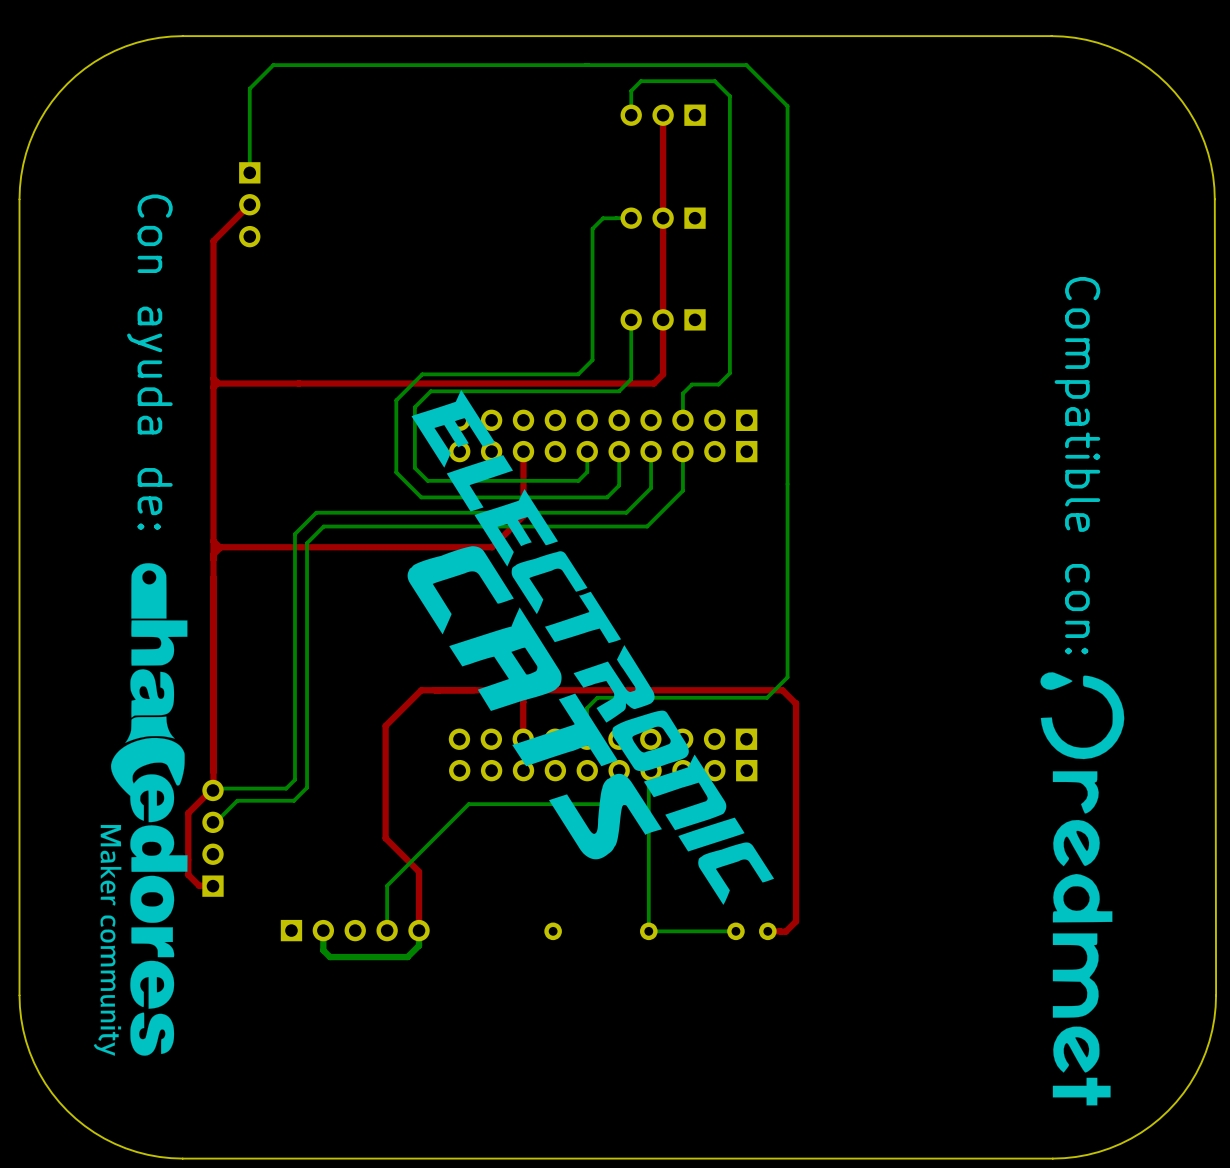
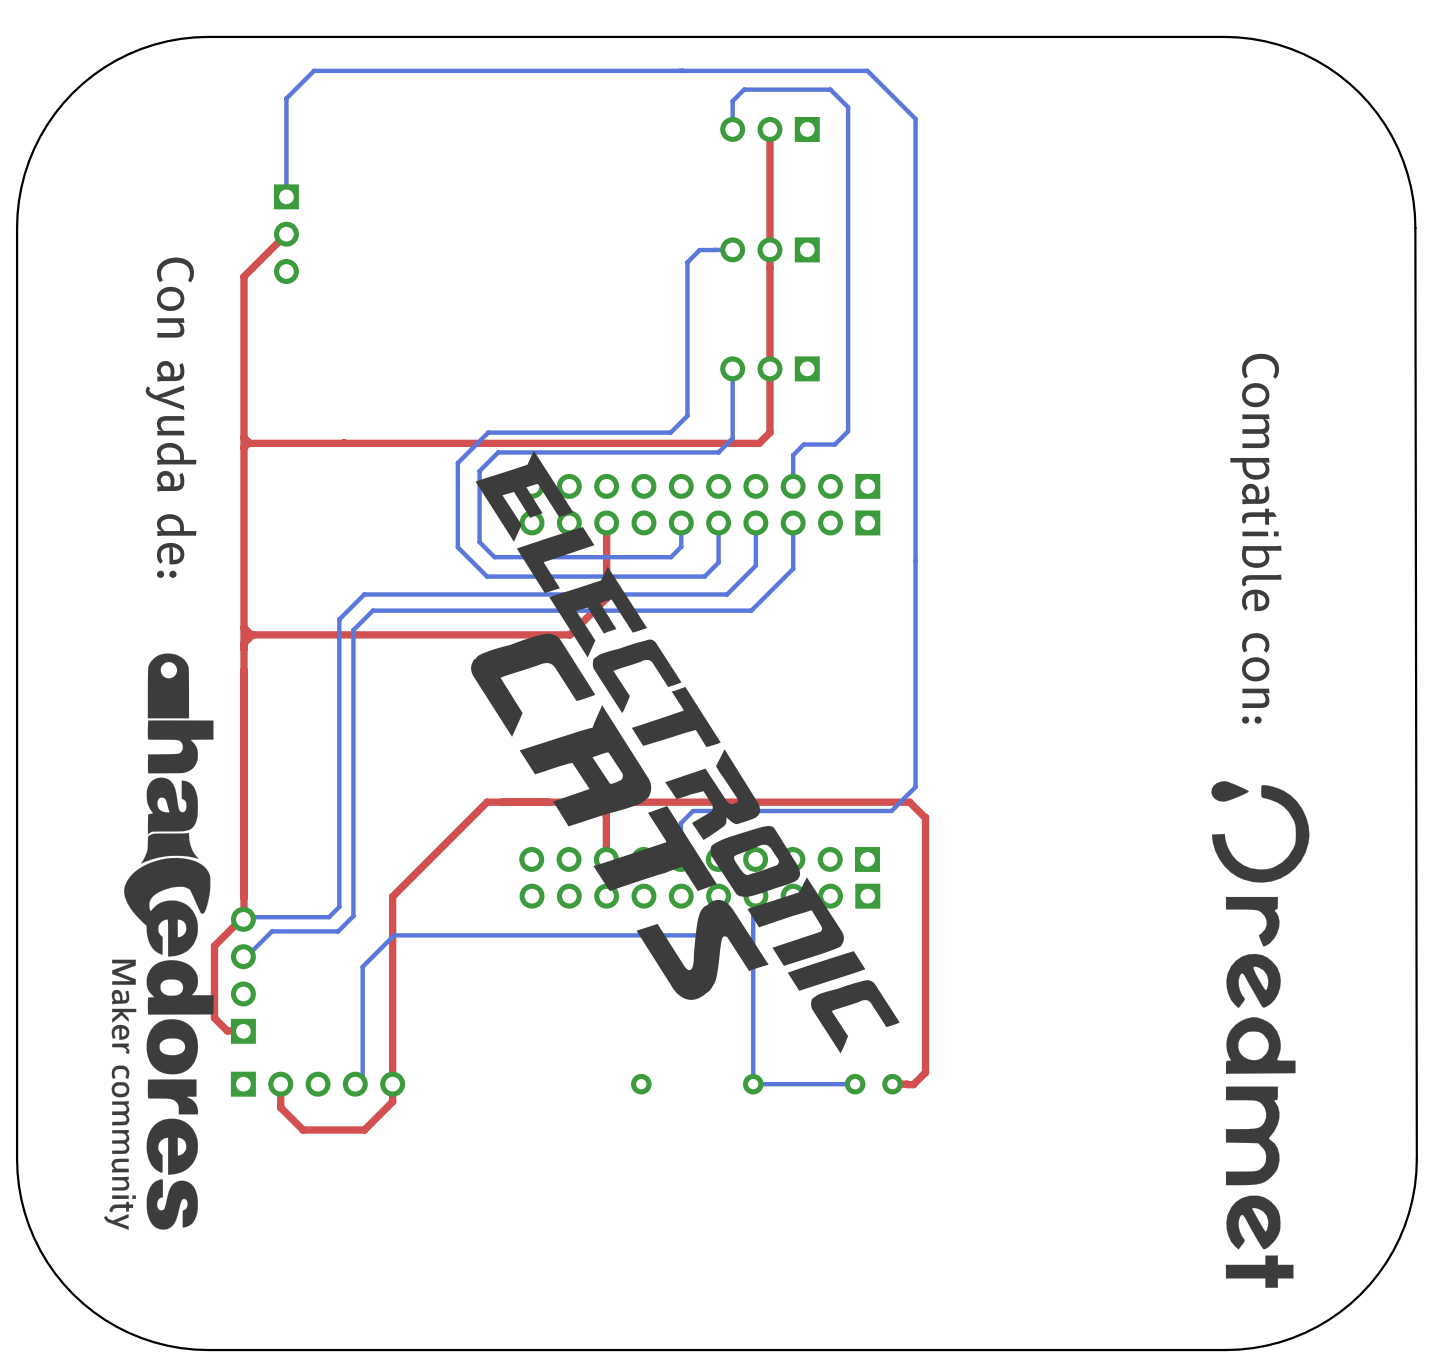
top track: (385, 725) (385, 838) (419, 871) (419, 930) -> (445, 843) (392, 896) (392, 1101) (364, 1130) (303, 1130) (280, 1107) (280, 1084)
bottom track: (468, 804) (387, 885) (387, 930) -> (542, 935) (394, 935) (362, 966) (362, 1076) (355, 1084)
part position: (355, 930) -> (318, 1084)
bottom track: (419, 930) (419, 945) (407, 957) (330, 957) (323, 950) (323, 930) -> none

